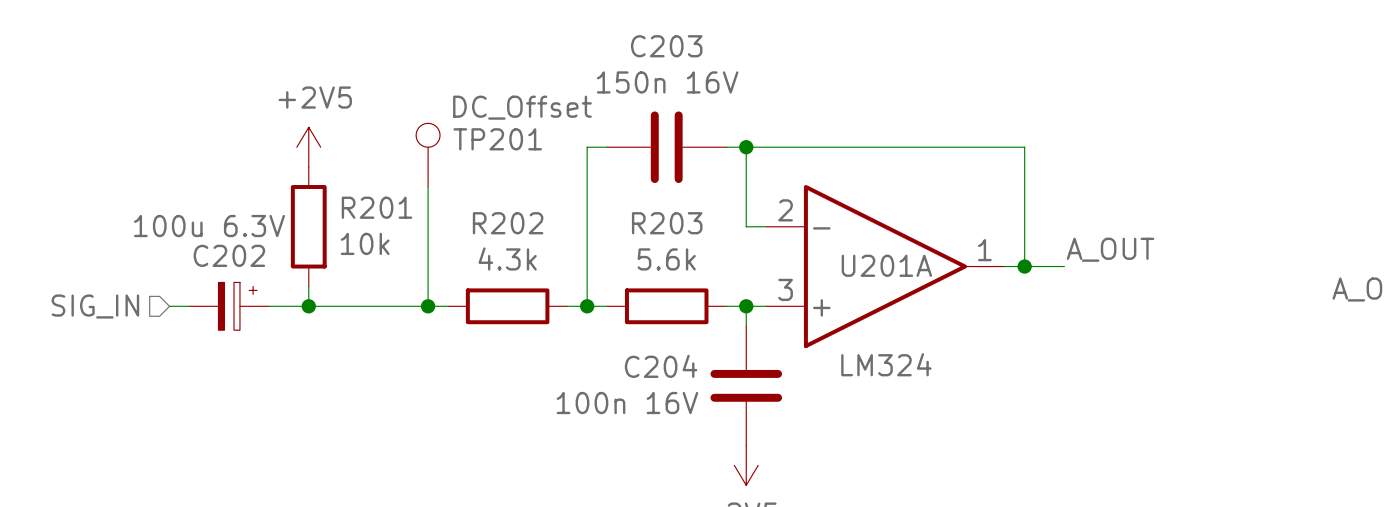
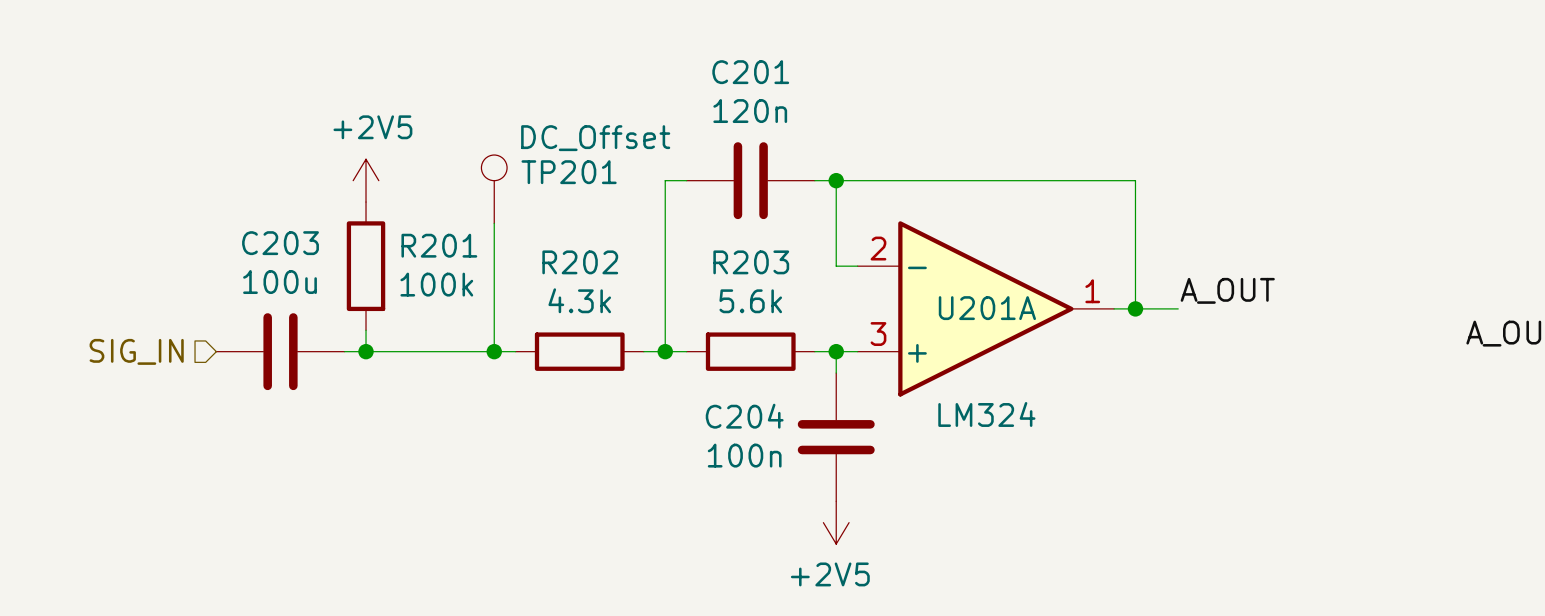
C203 name: C203 (666, 46) -> C201 (750, 72)
C203 value: 150n 16V (667, 82) -> 120n (750, 111)
R201 value: 10k (365, 243) -> 100k (436, 284)
C202: 100u 6.3V (229, 306) -> none
C203: none -> 100u (280, 351)
C204 value: 100n 16V (627, 403) -> 100n (744, 455)

